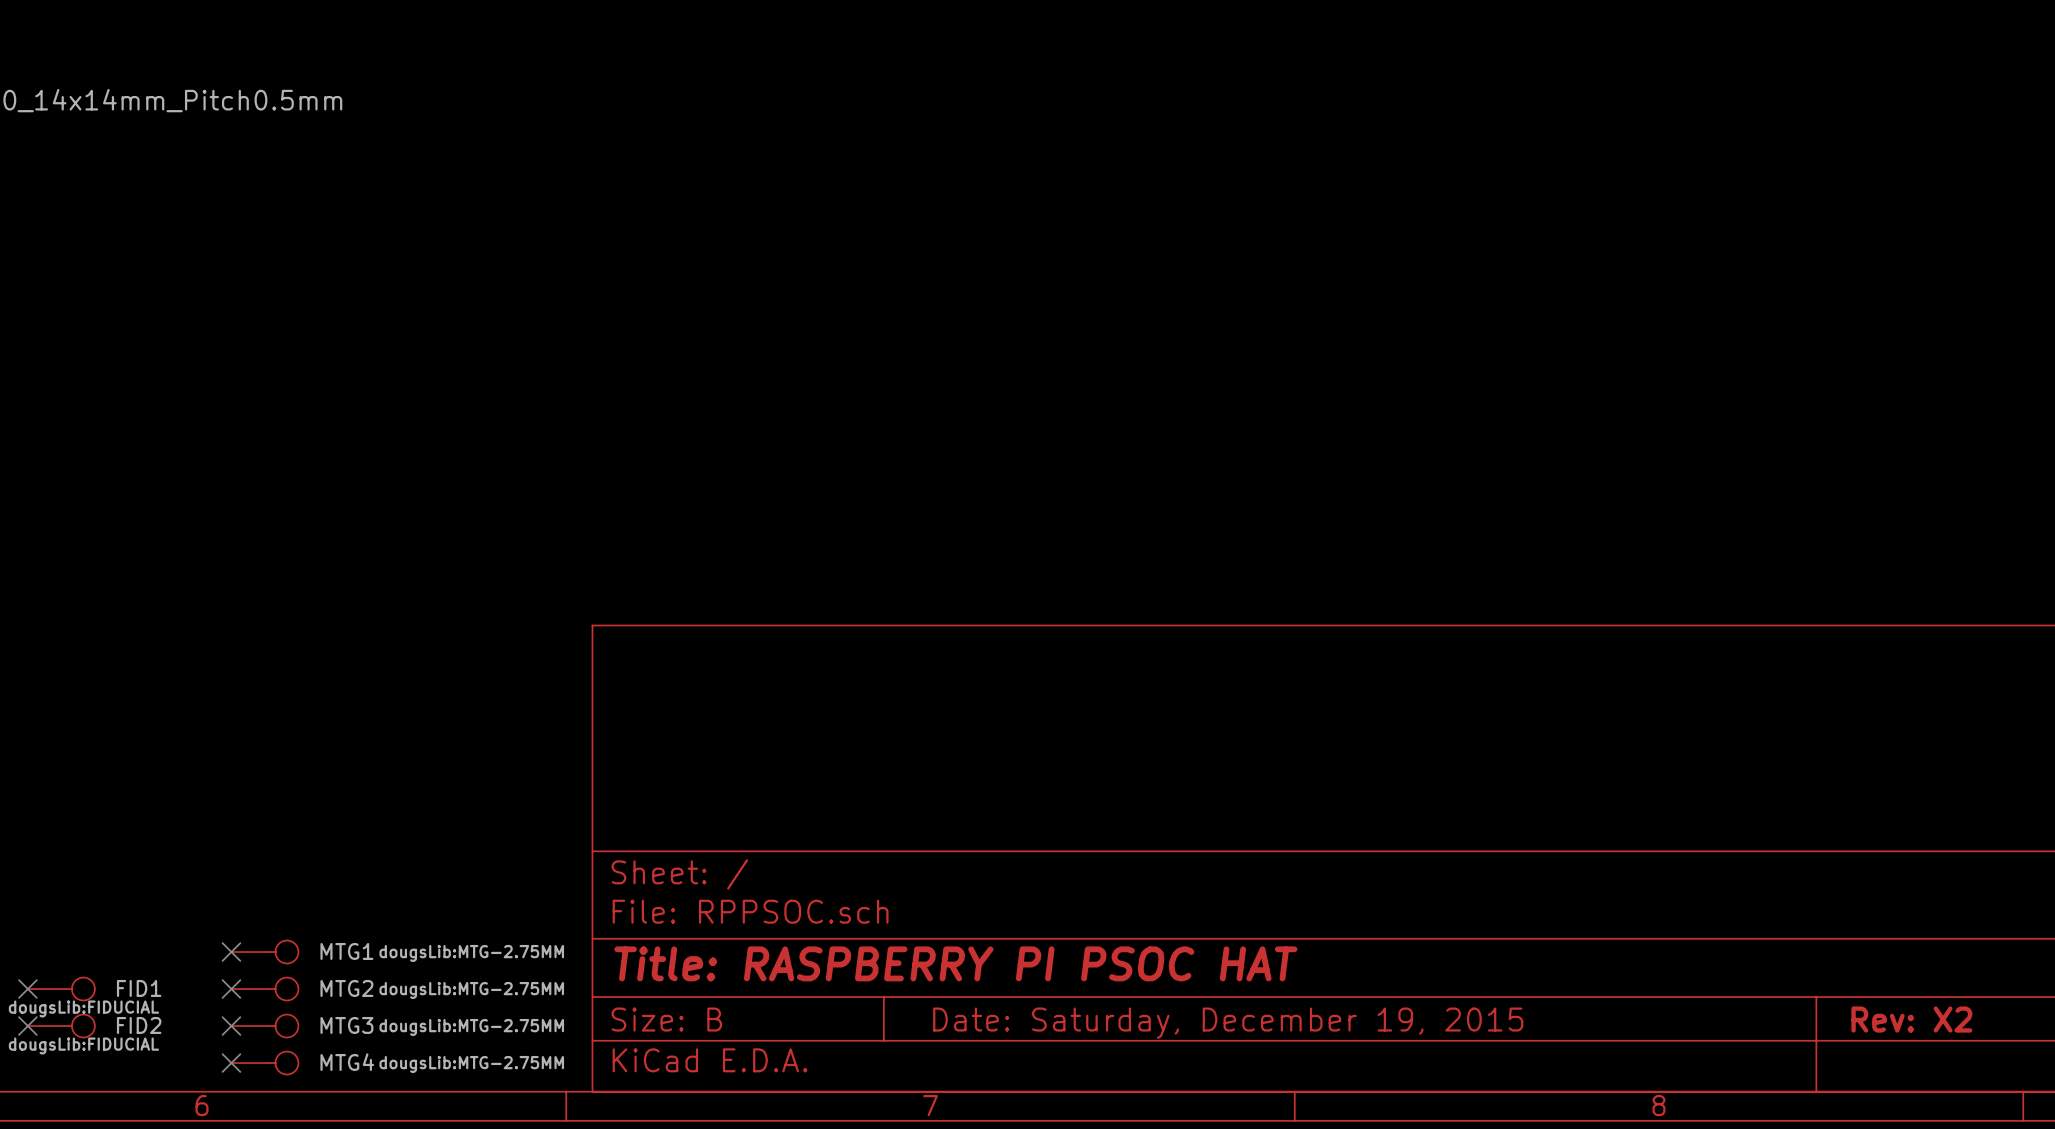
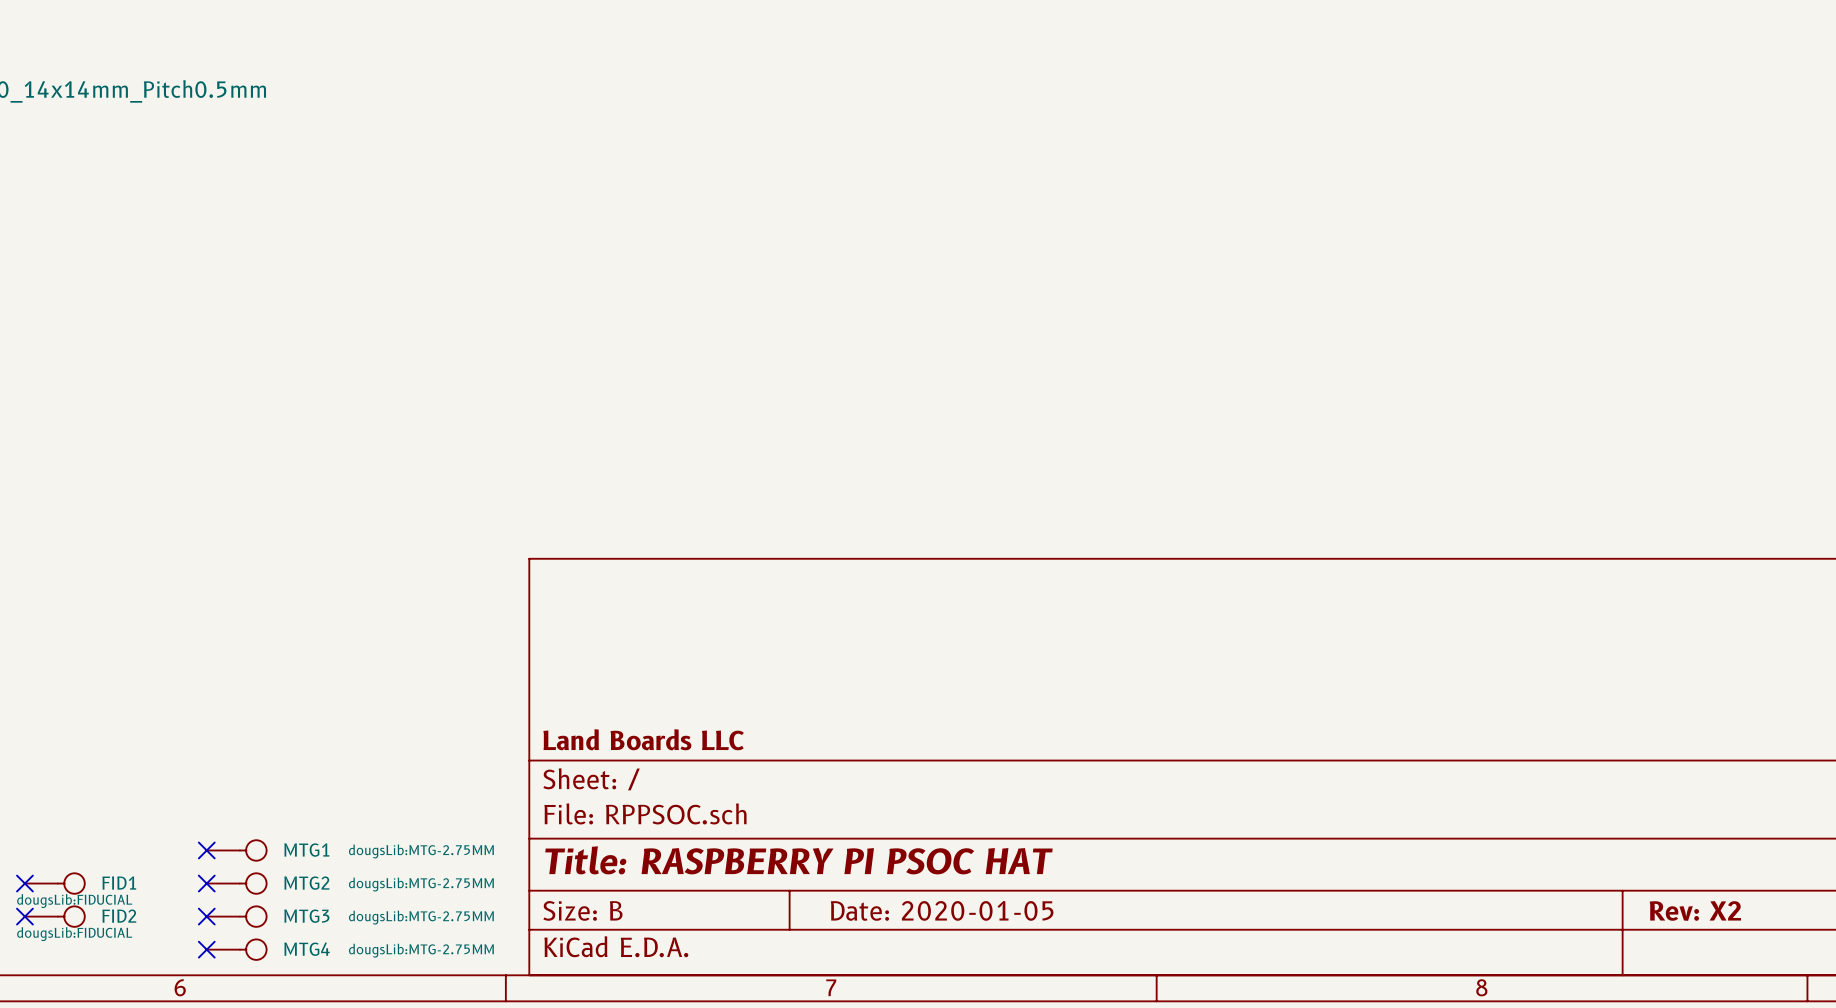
title block: none -> Land Boards LLC (643, 739)
title block: Date: Saturday, December 19, 2015 (1228, 1023) -> Date: 2020-01-05 (942, 910)

